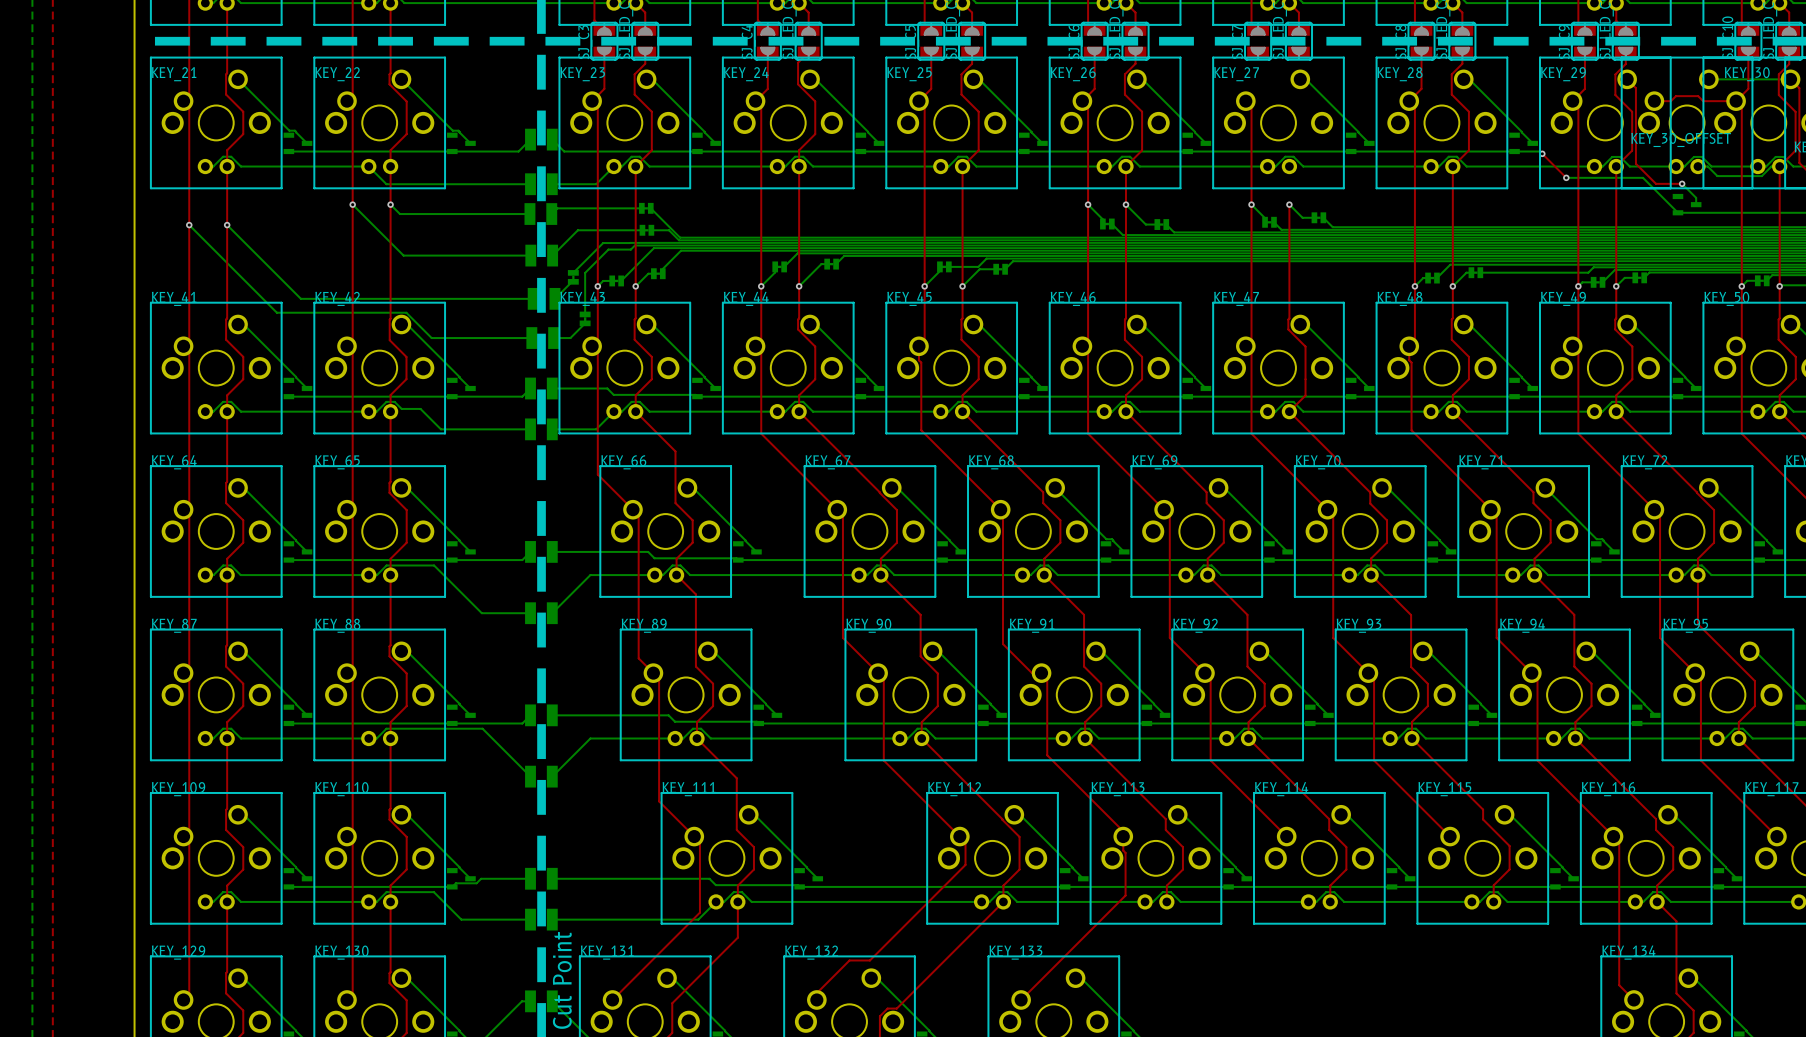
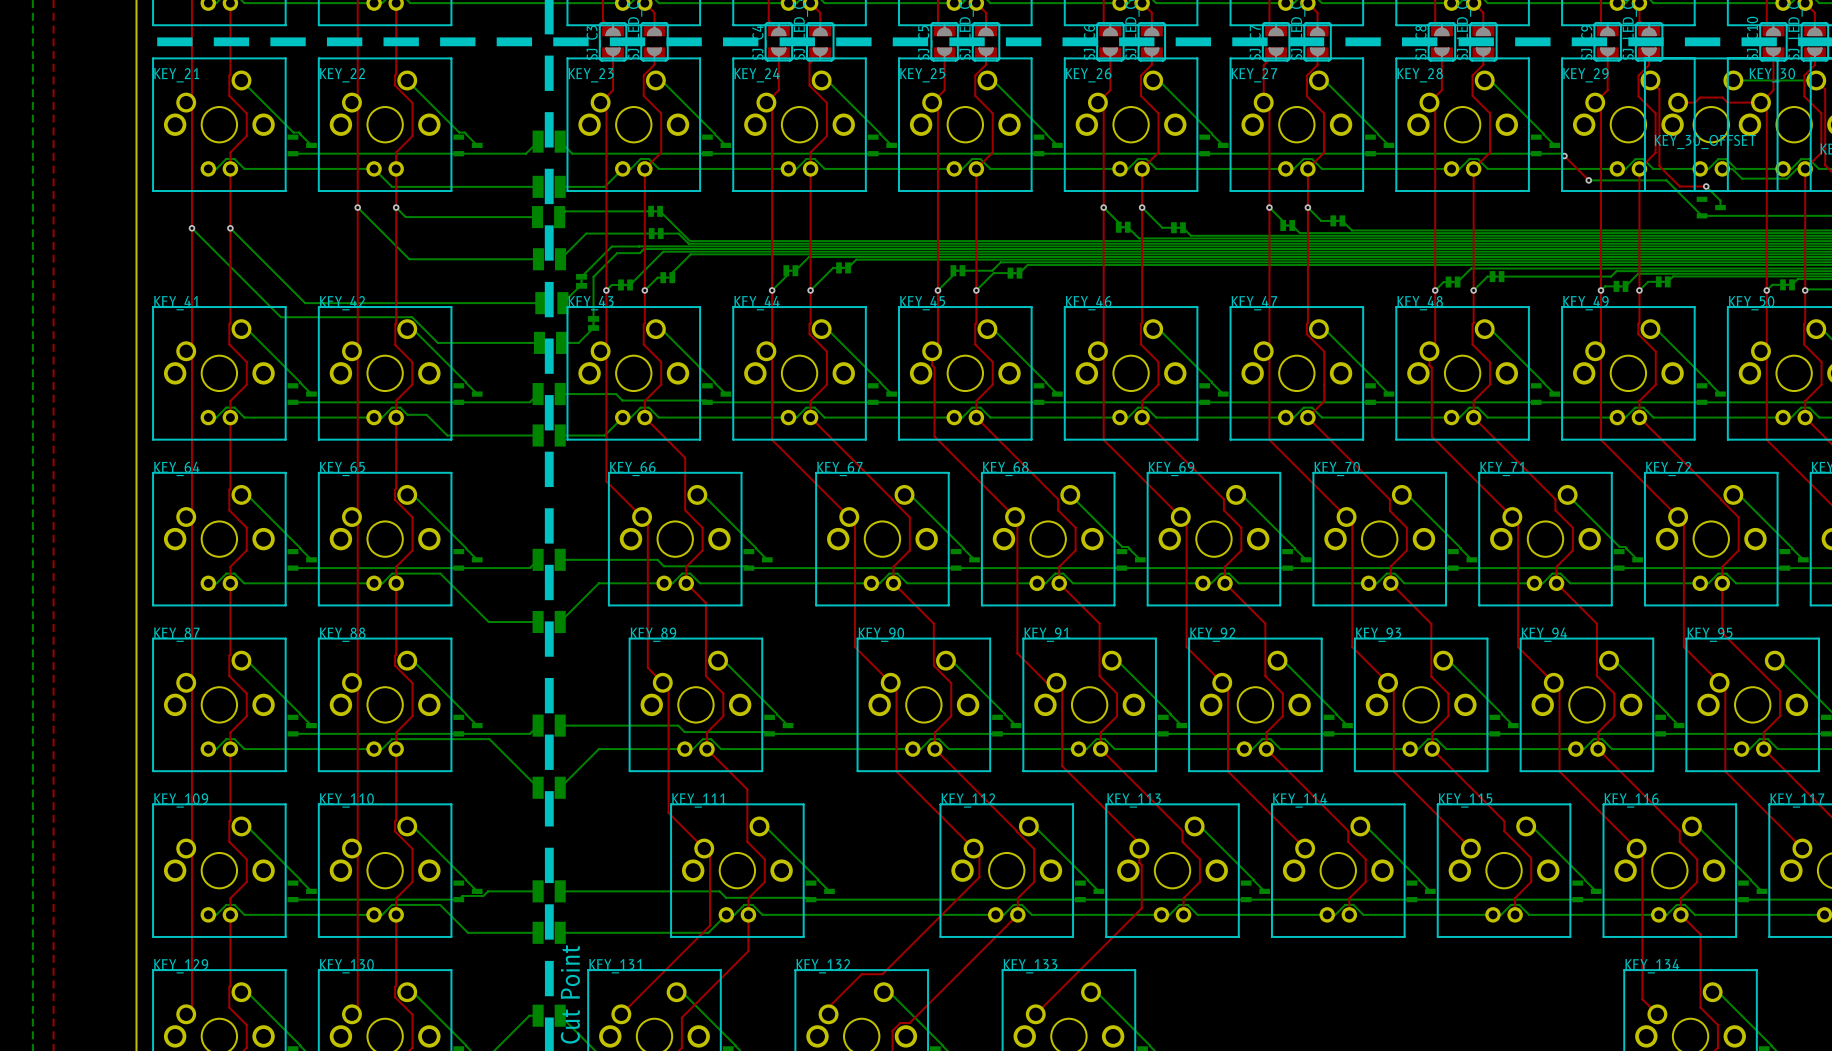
top track: none -> (1276, 52) (1263, 65) (1263, 102) (1269, 108)
top track: none -> (1317, 52) (1317, 65) (1307, 75) (1307, 96) (1324, 113) (1324, 152) (1307, 168) (1307, 207)

